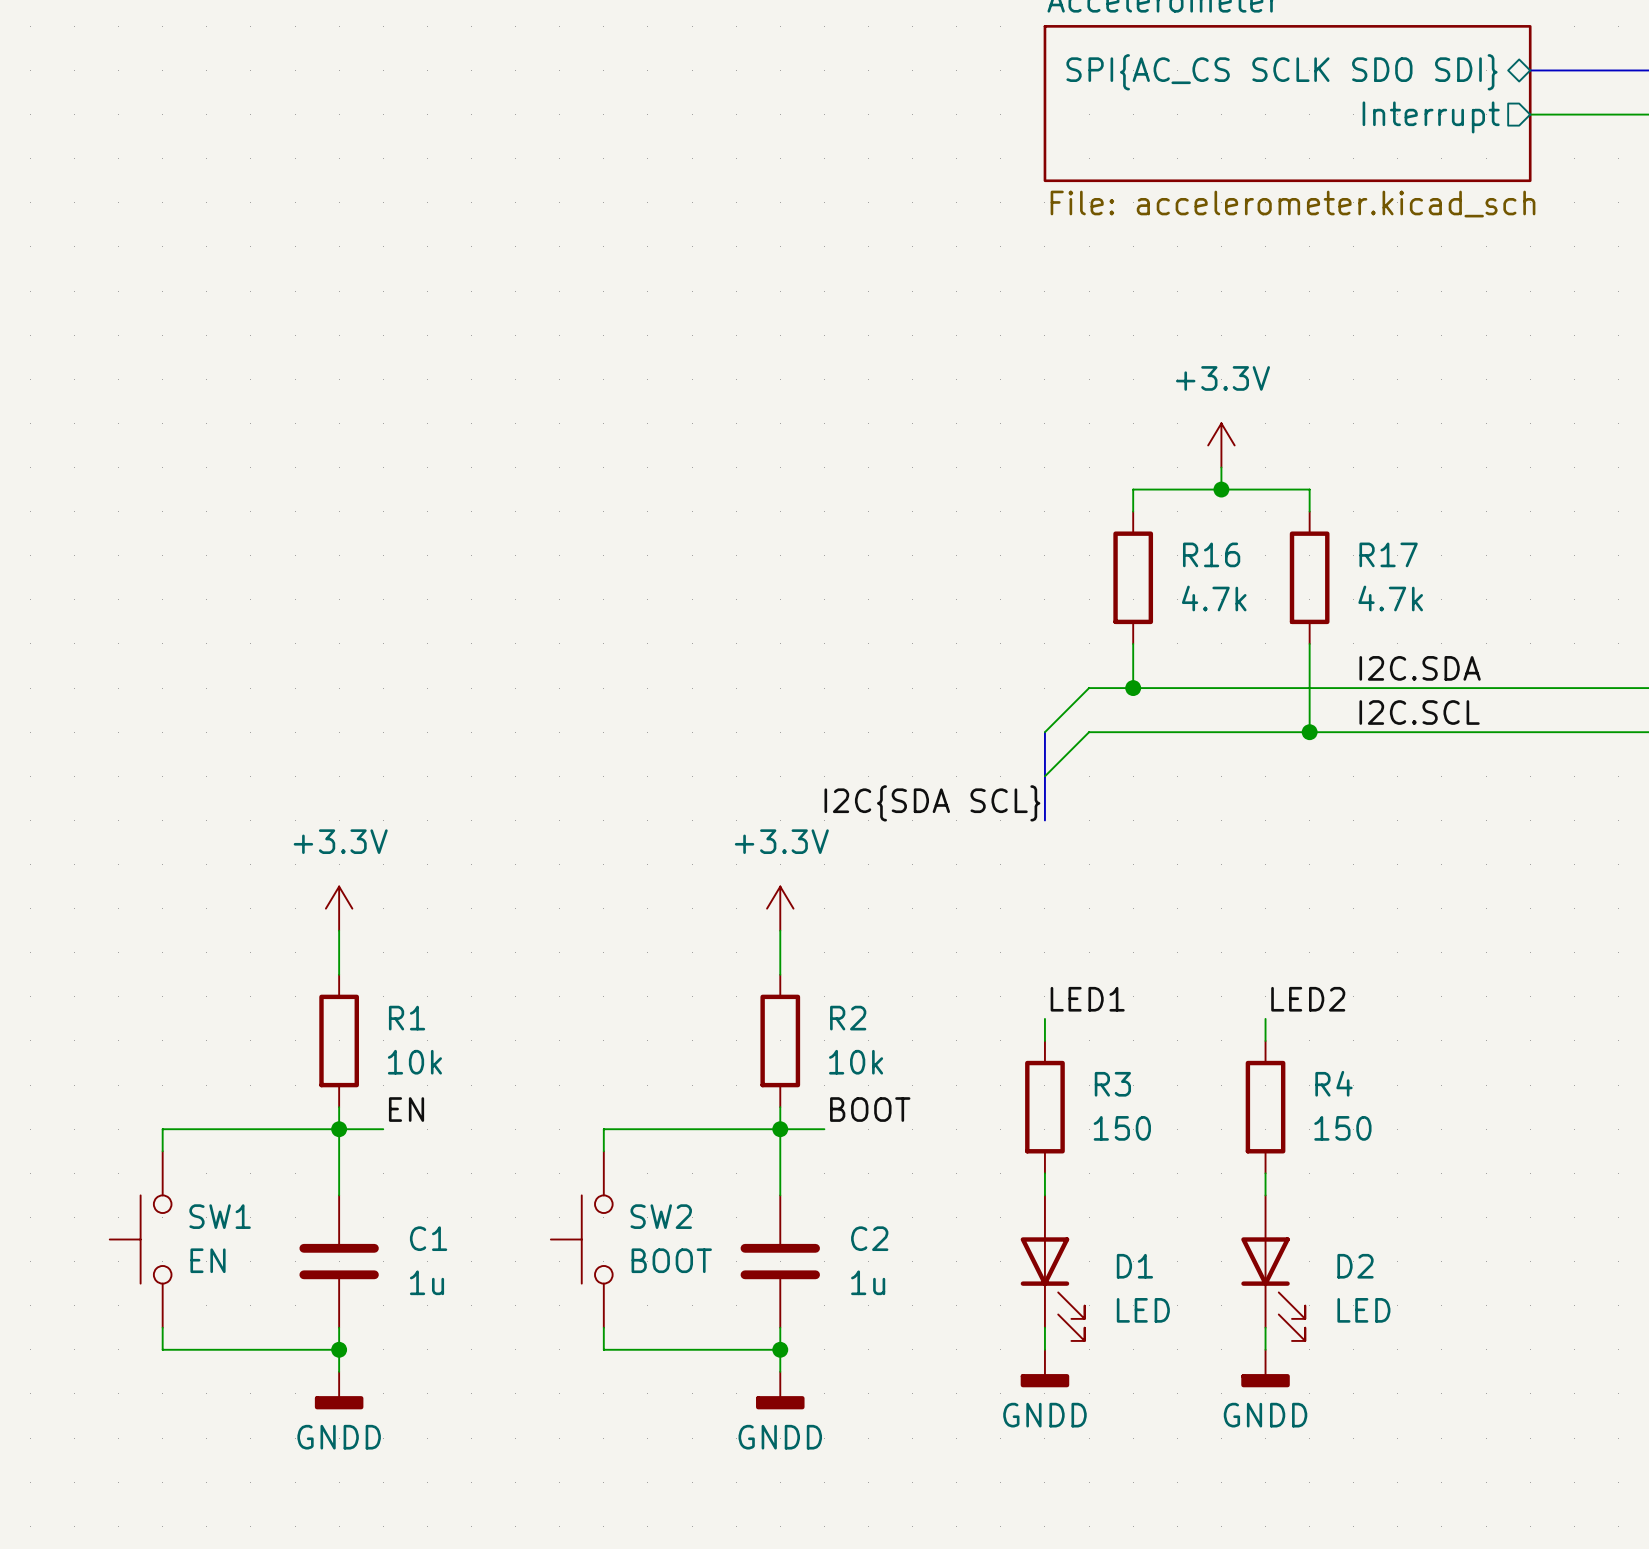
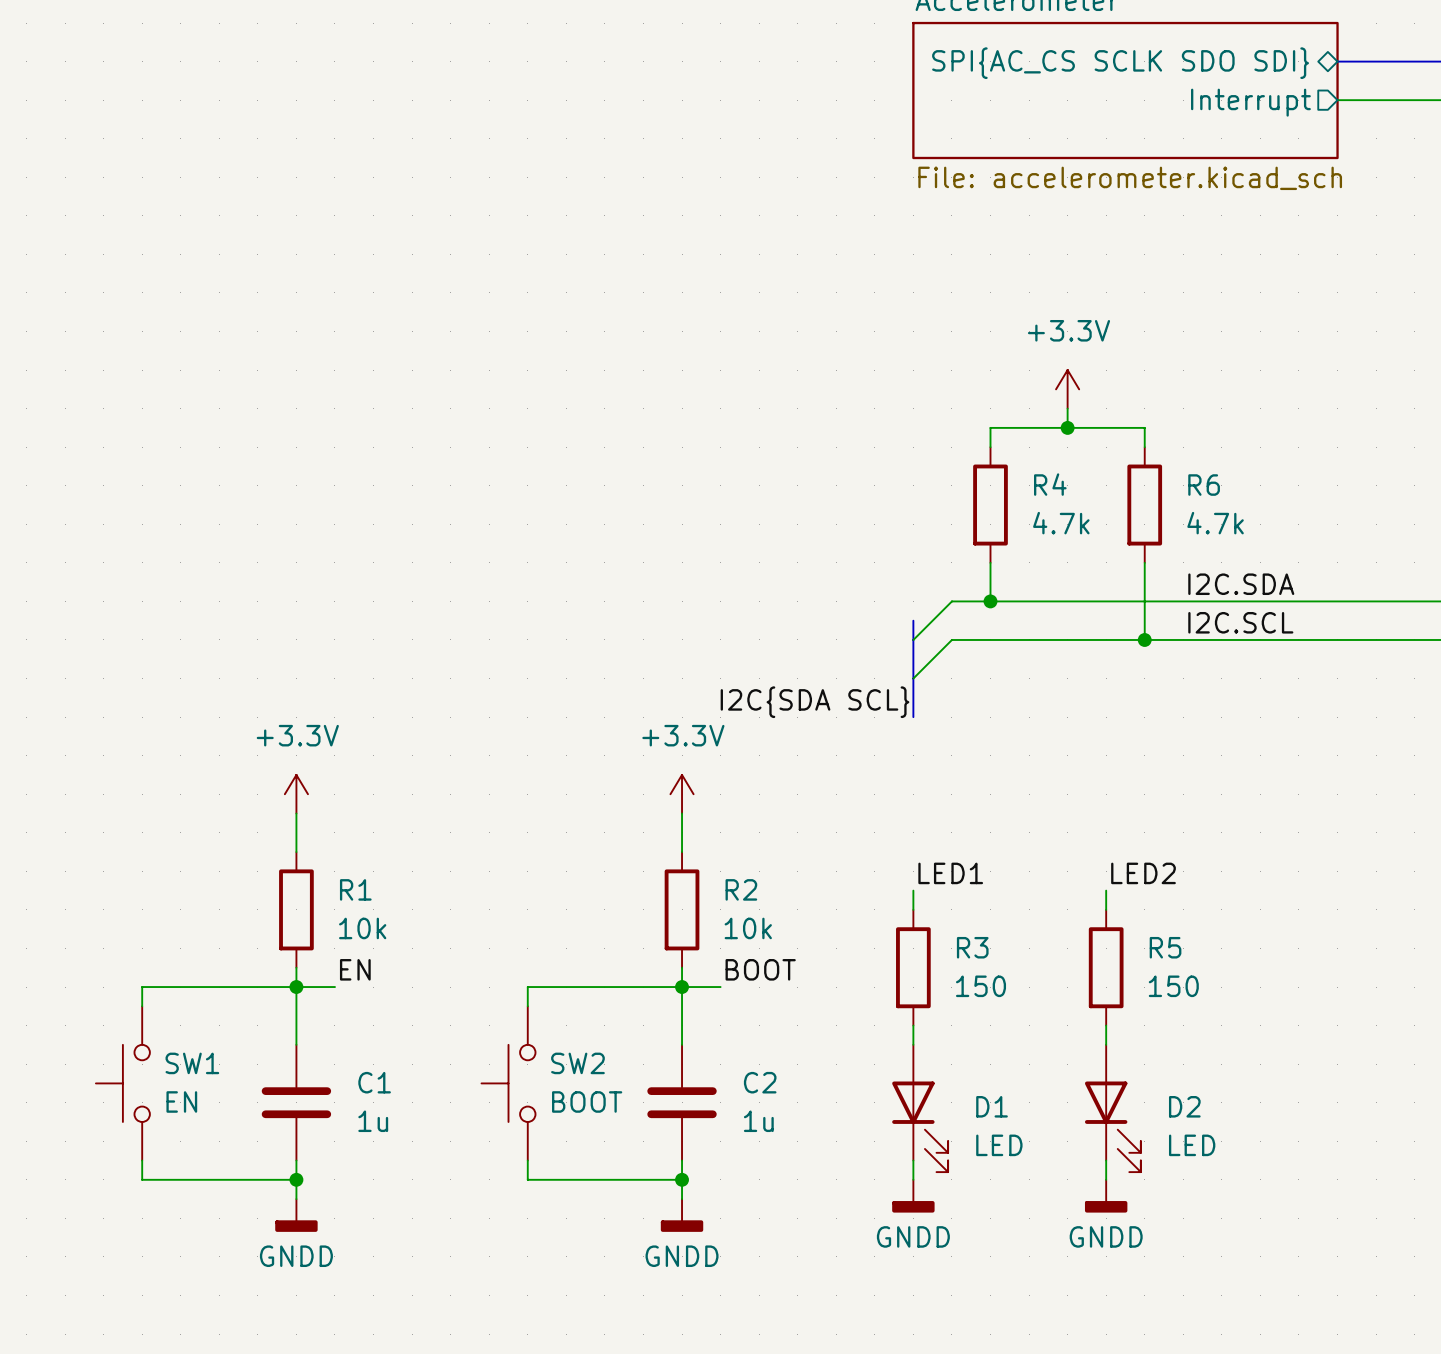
R16 name: R16 (1211, 554) -> R4 (1050, 484)
R17 name: R17 (1388, 554) -> R6 (1204, 485)
bus: none -> (913, 620) (913, 639)
R4 name: R4 (1333, 1083) -> R5 (1165, 947)

